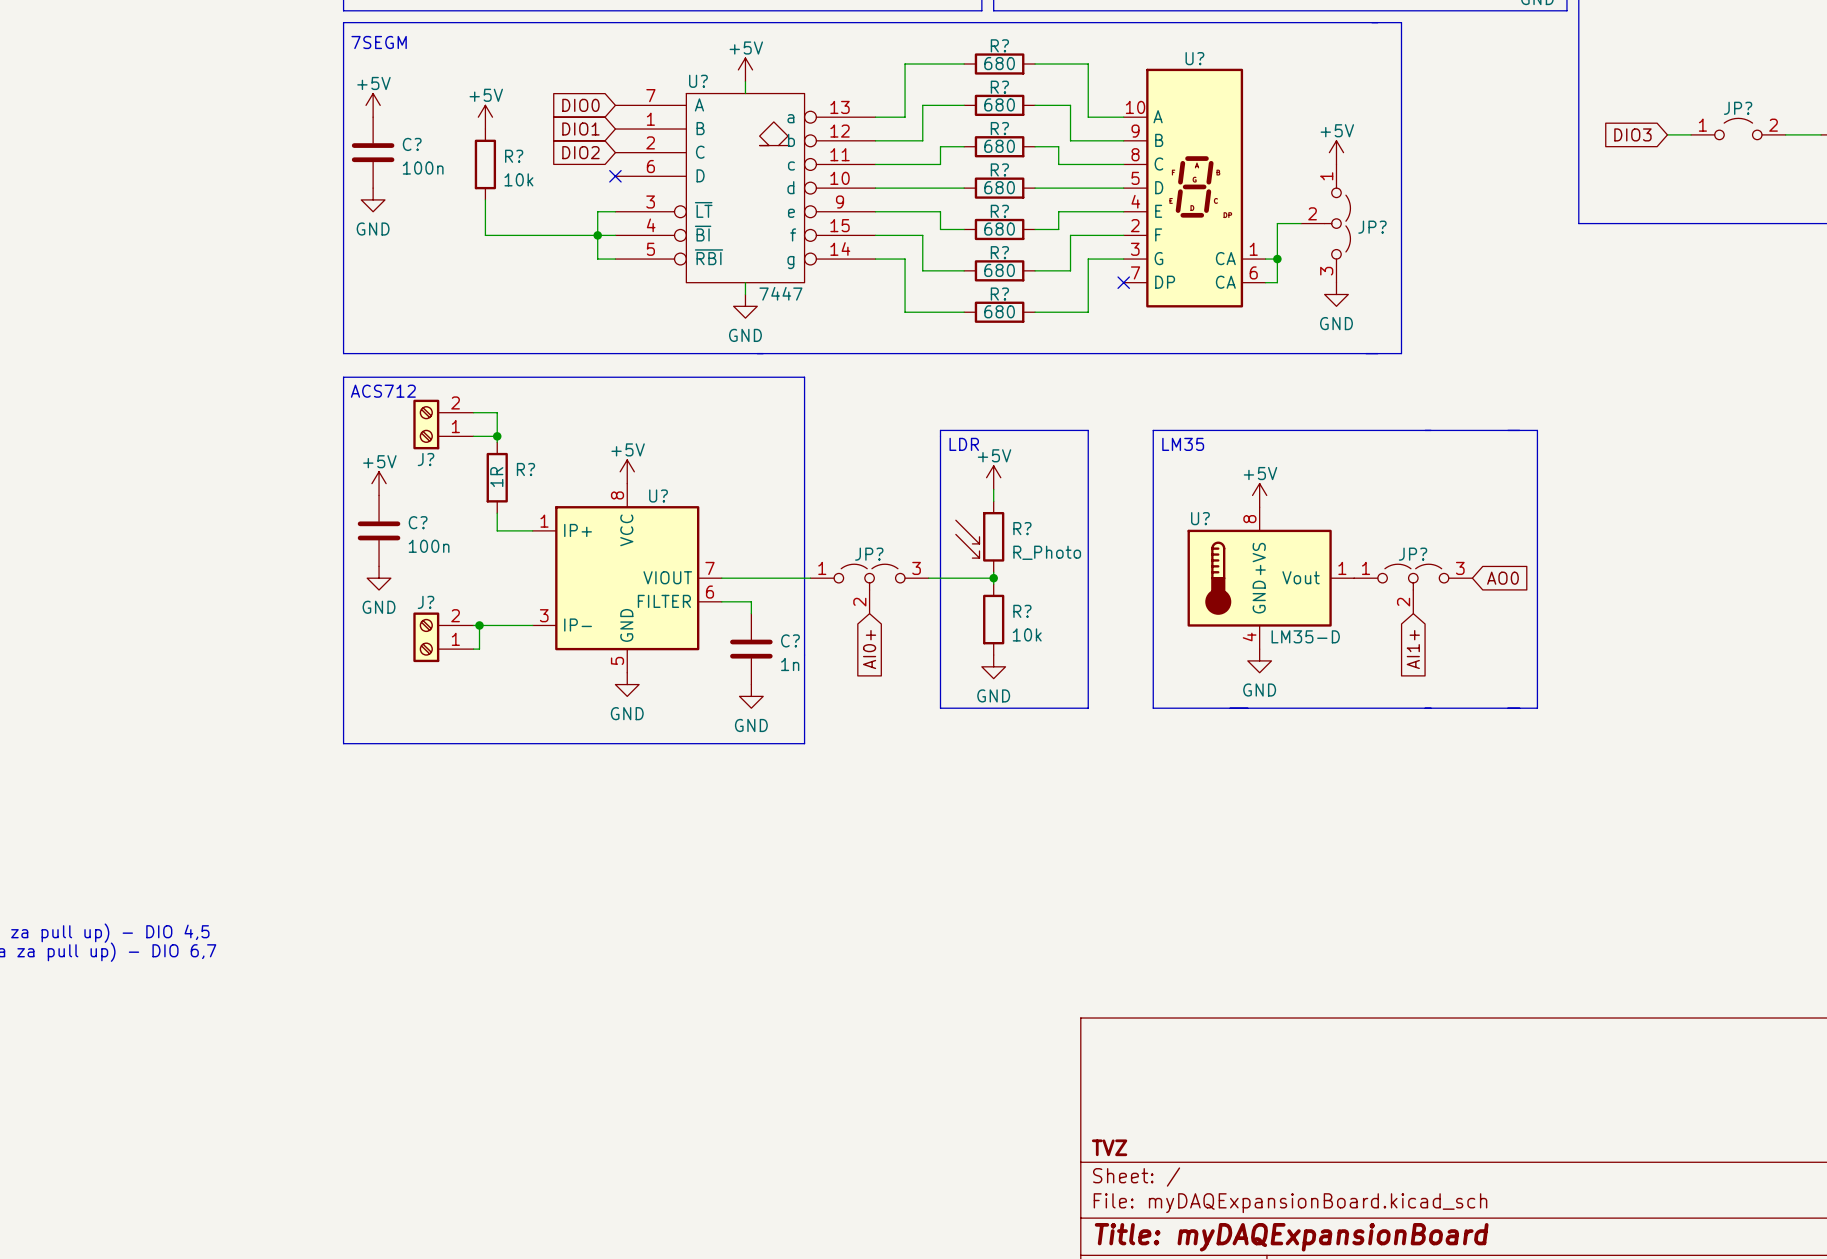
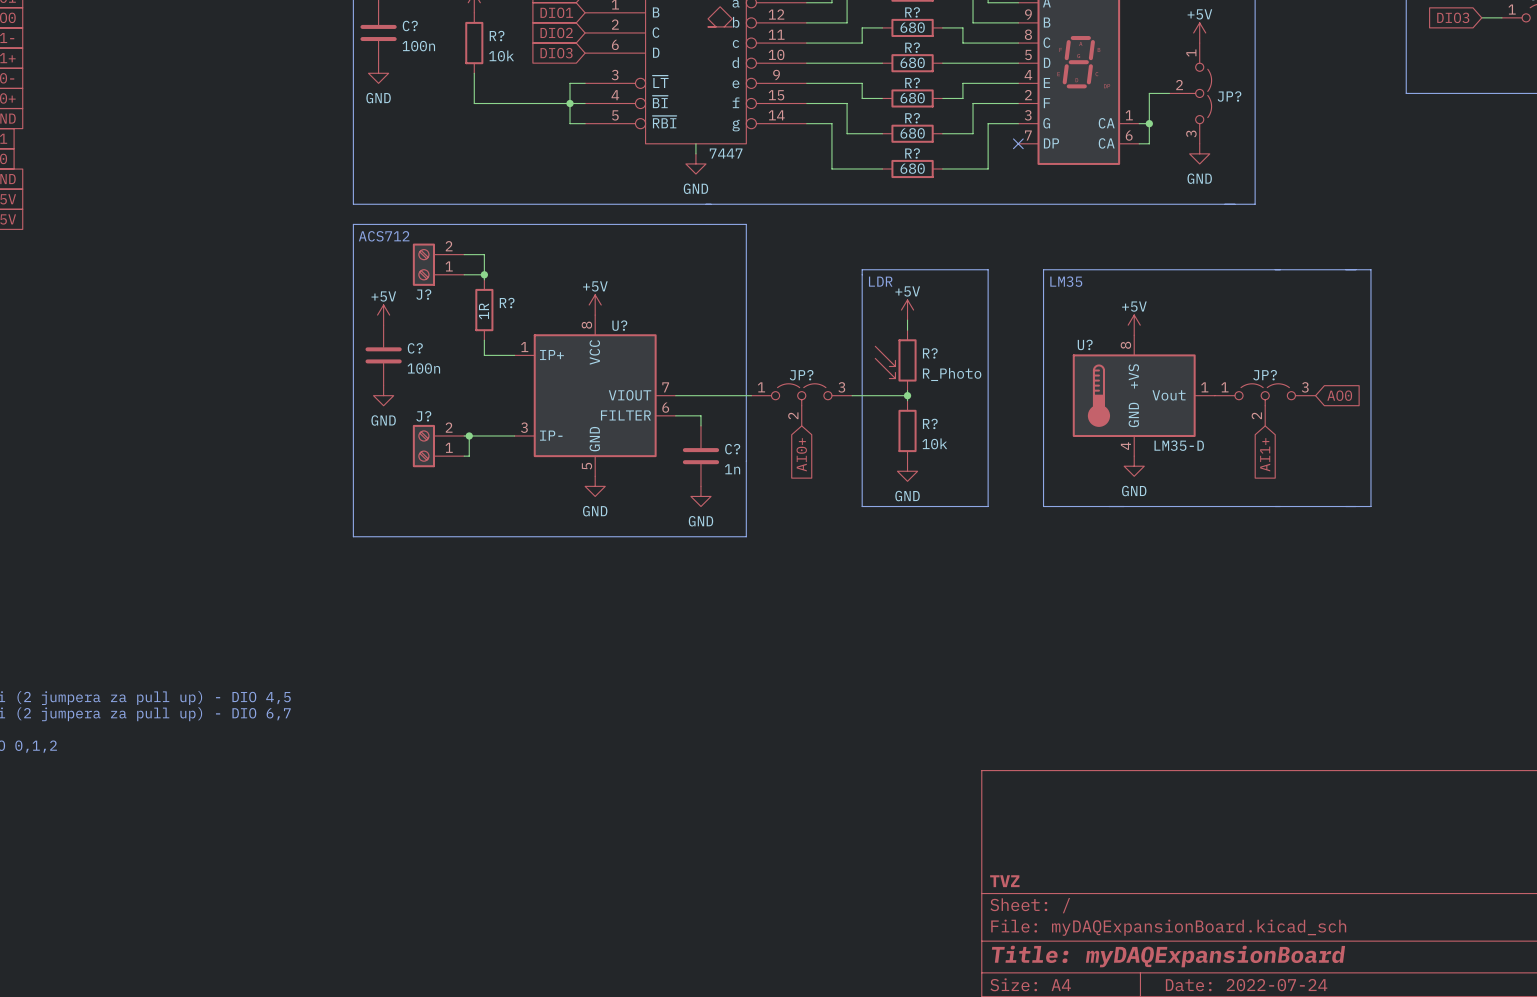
global label: none -> DIO3 (556, 53)
no-connect mark: (615, 176) -> none

